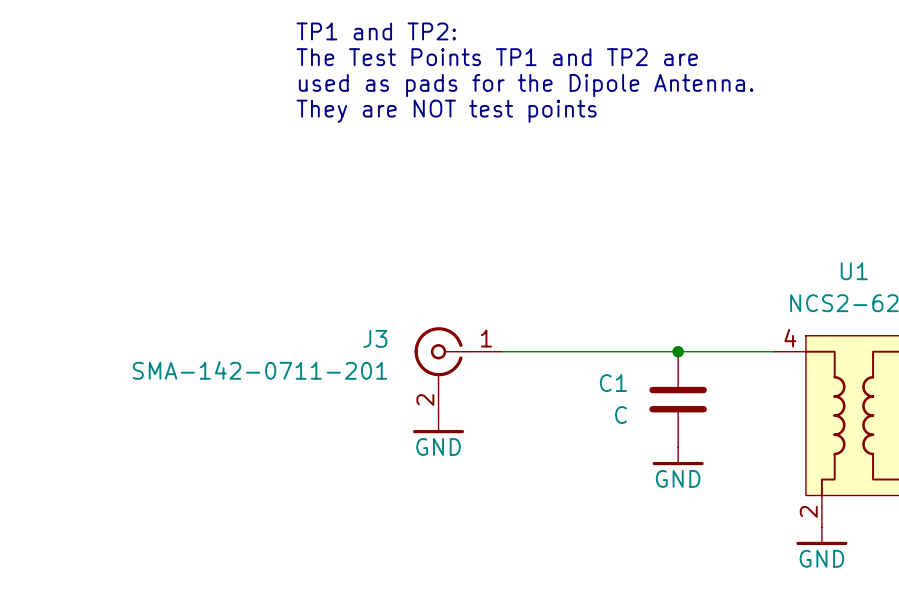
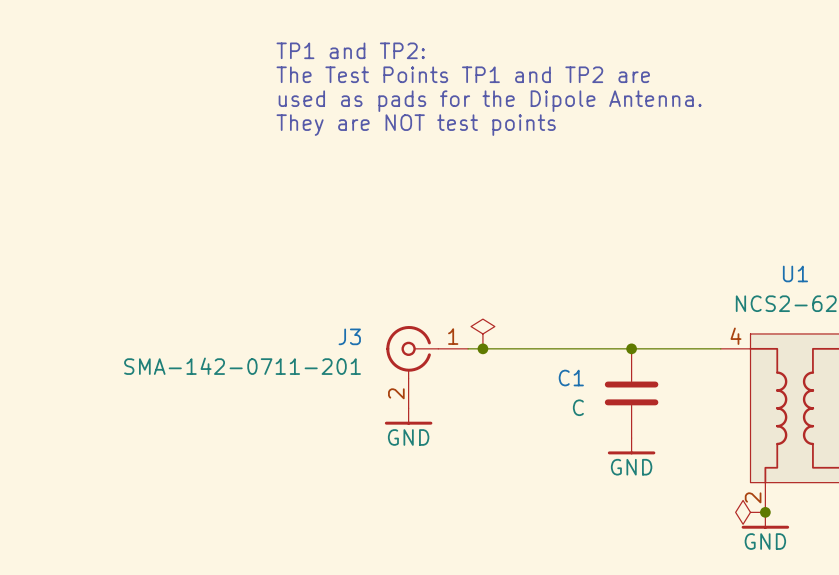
power symbol: none -> (482, 333)
junction: none -> (482, 348)
power symbol: none -> (750, 512)
junction: none -> (765, 512)

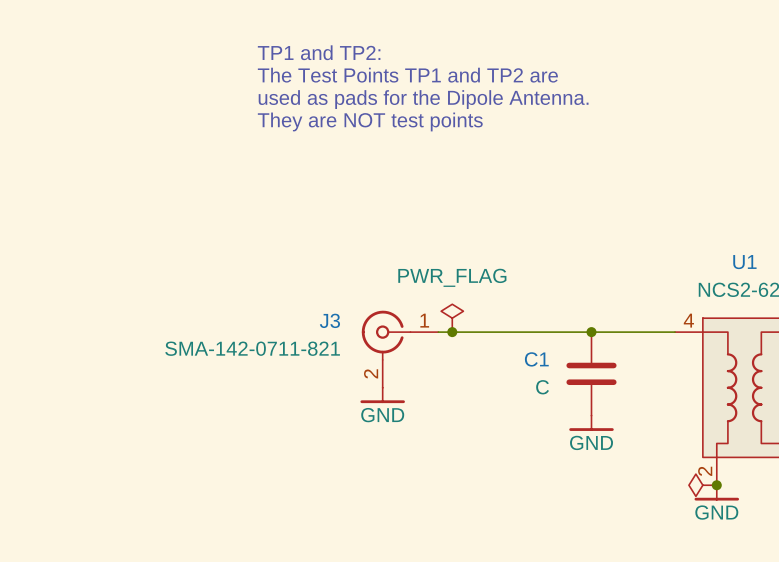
power symbol text: none -> PWR_FLAG (452, 277)
J3 value: SMA-142-0711-201 (242, 366) -> SMA-142-0711-821 (252, 348)

